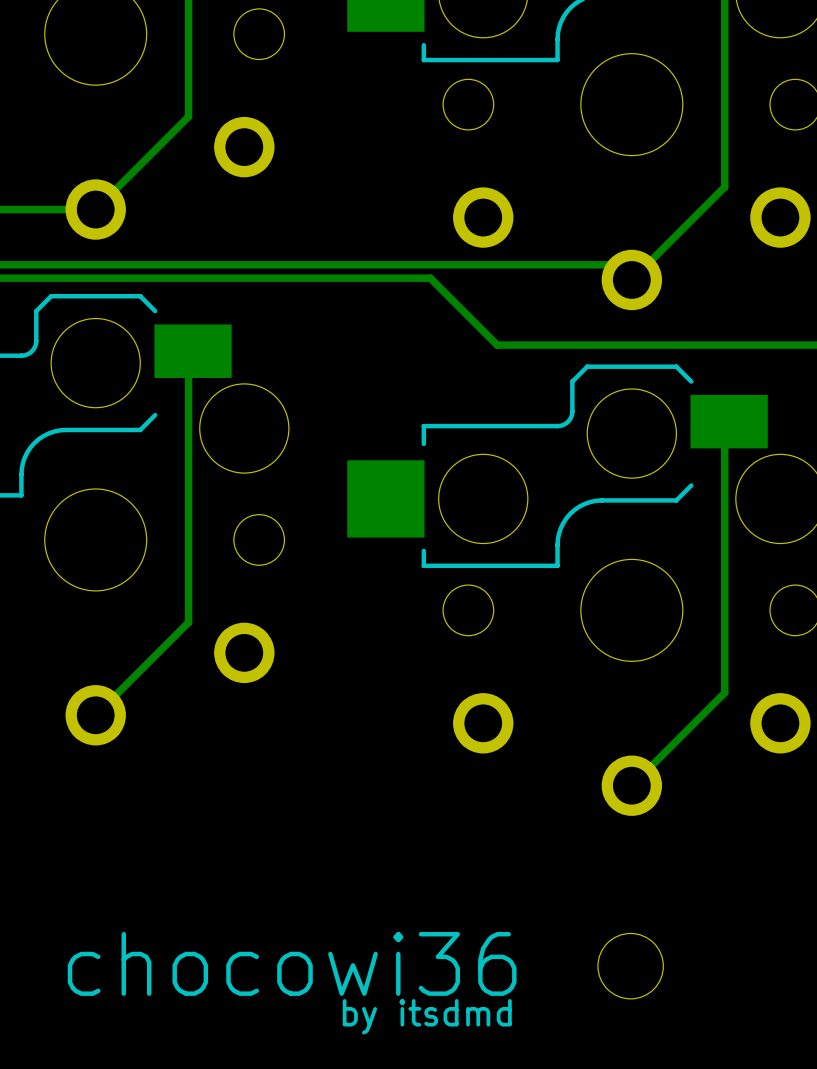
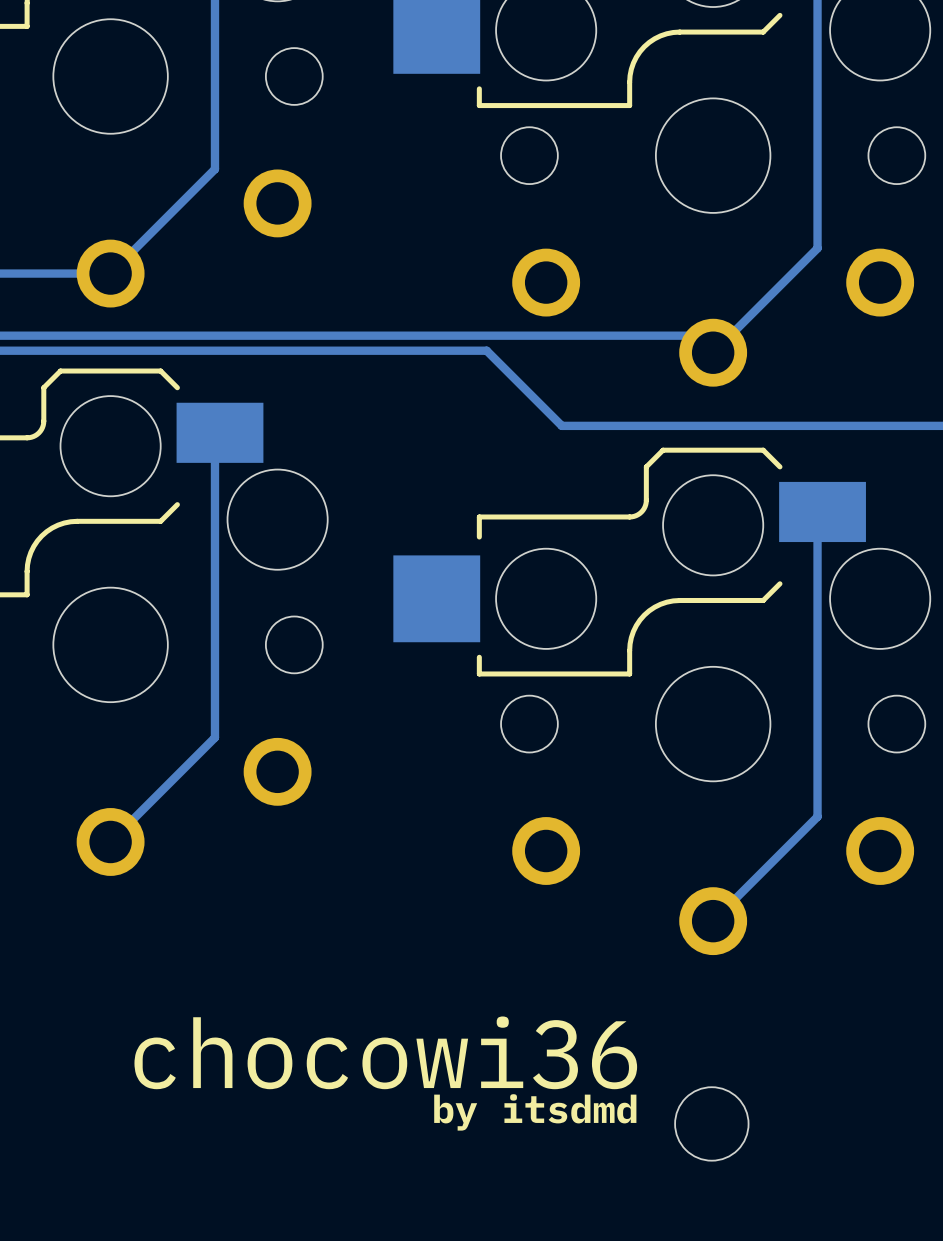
text position: chocowi36 (292, 963) -> chocowi36 (385, 1052)
text position: by itsdmd (427, 1016) -> by itsdmd (535, 1112)

